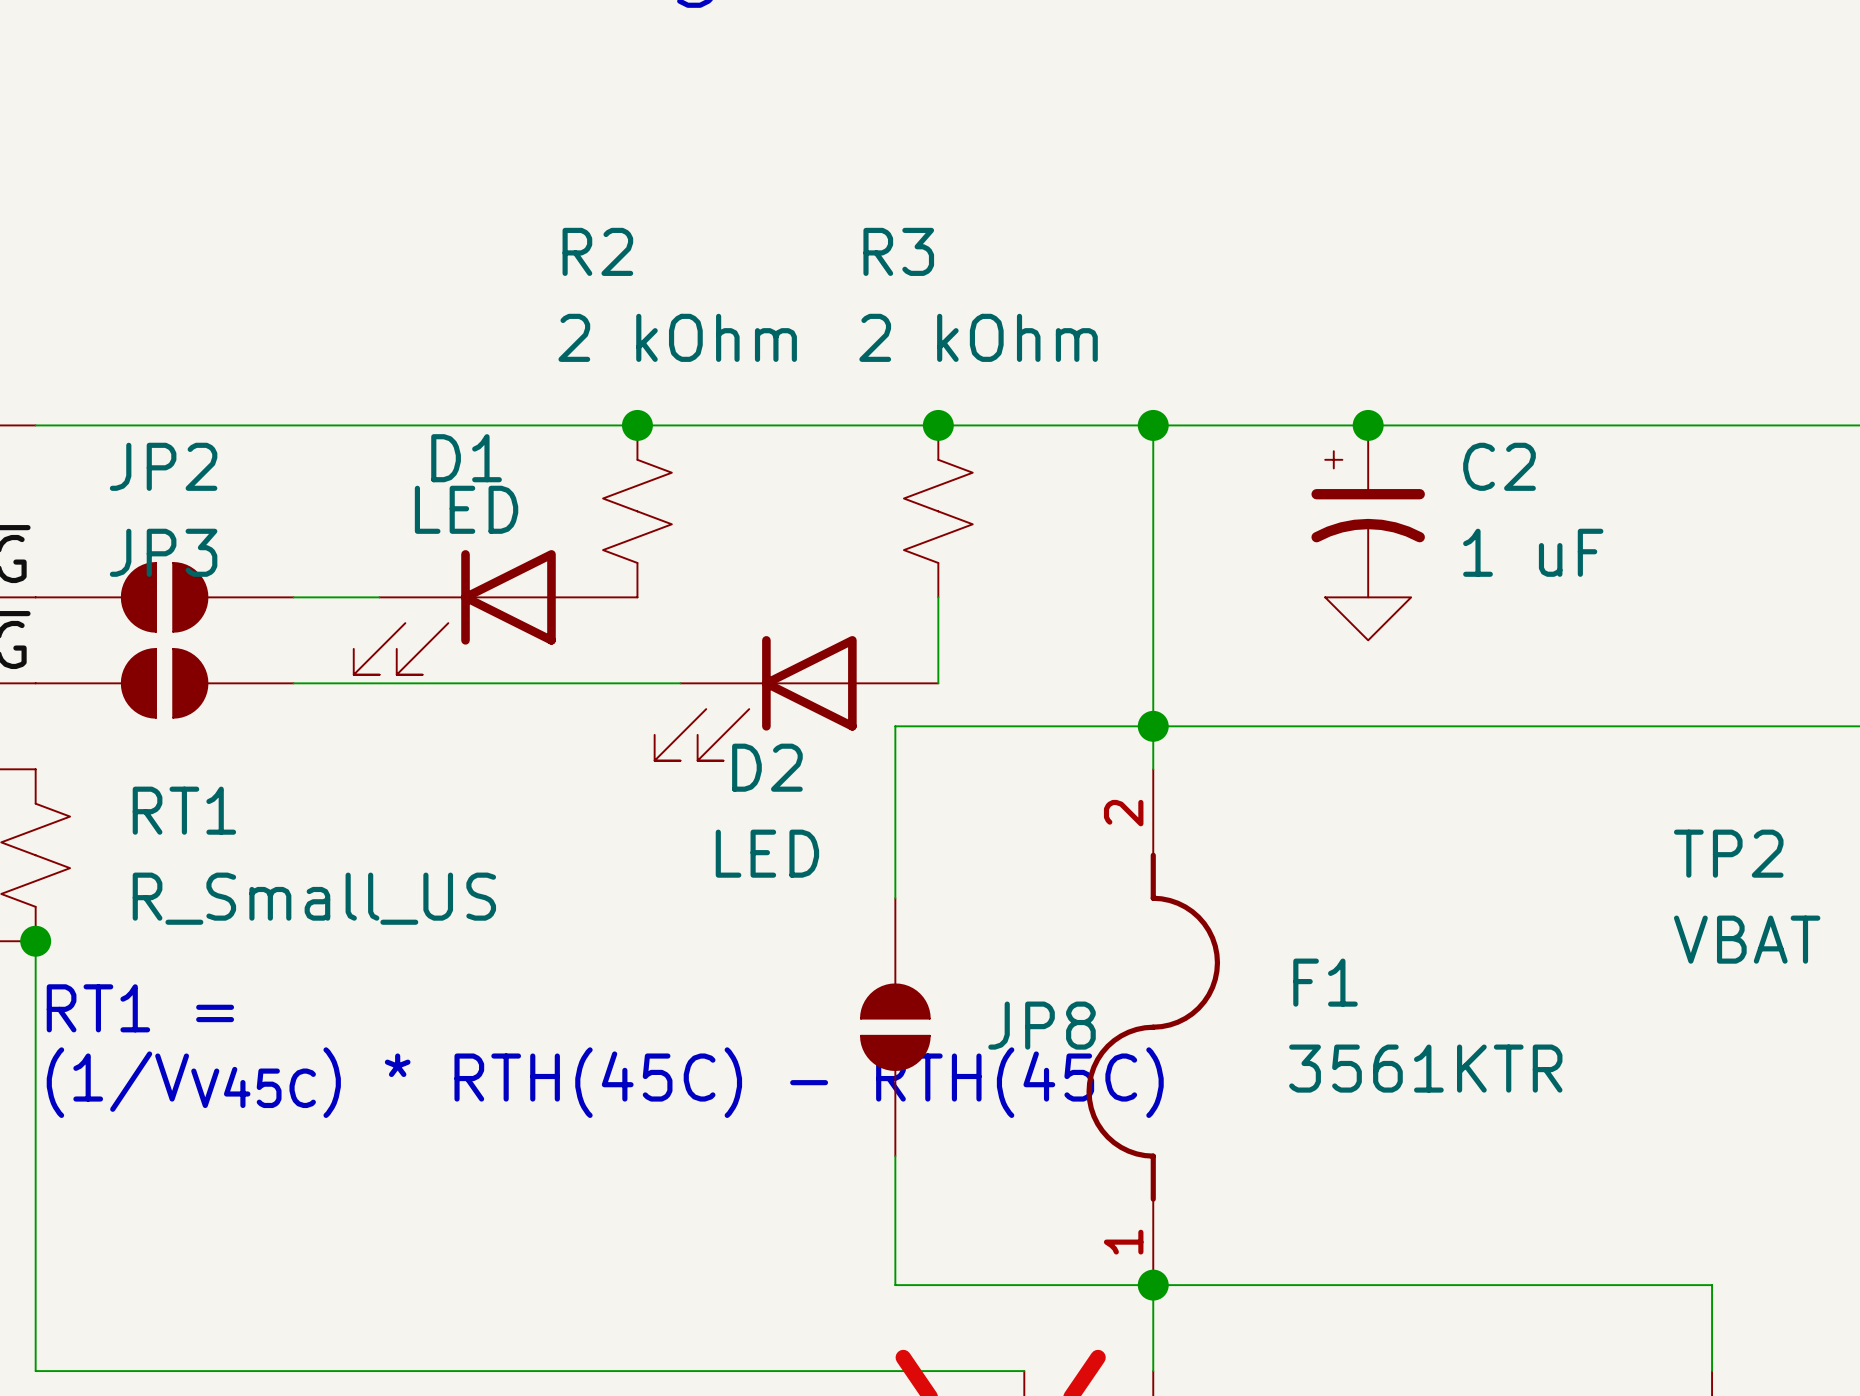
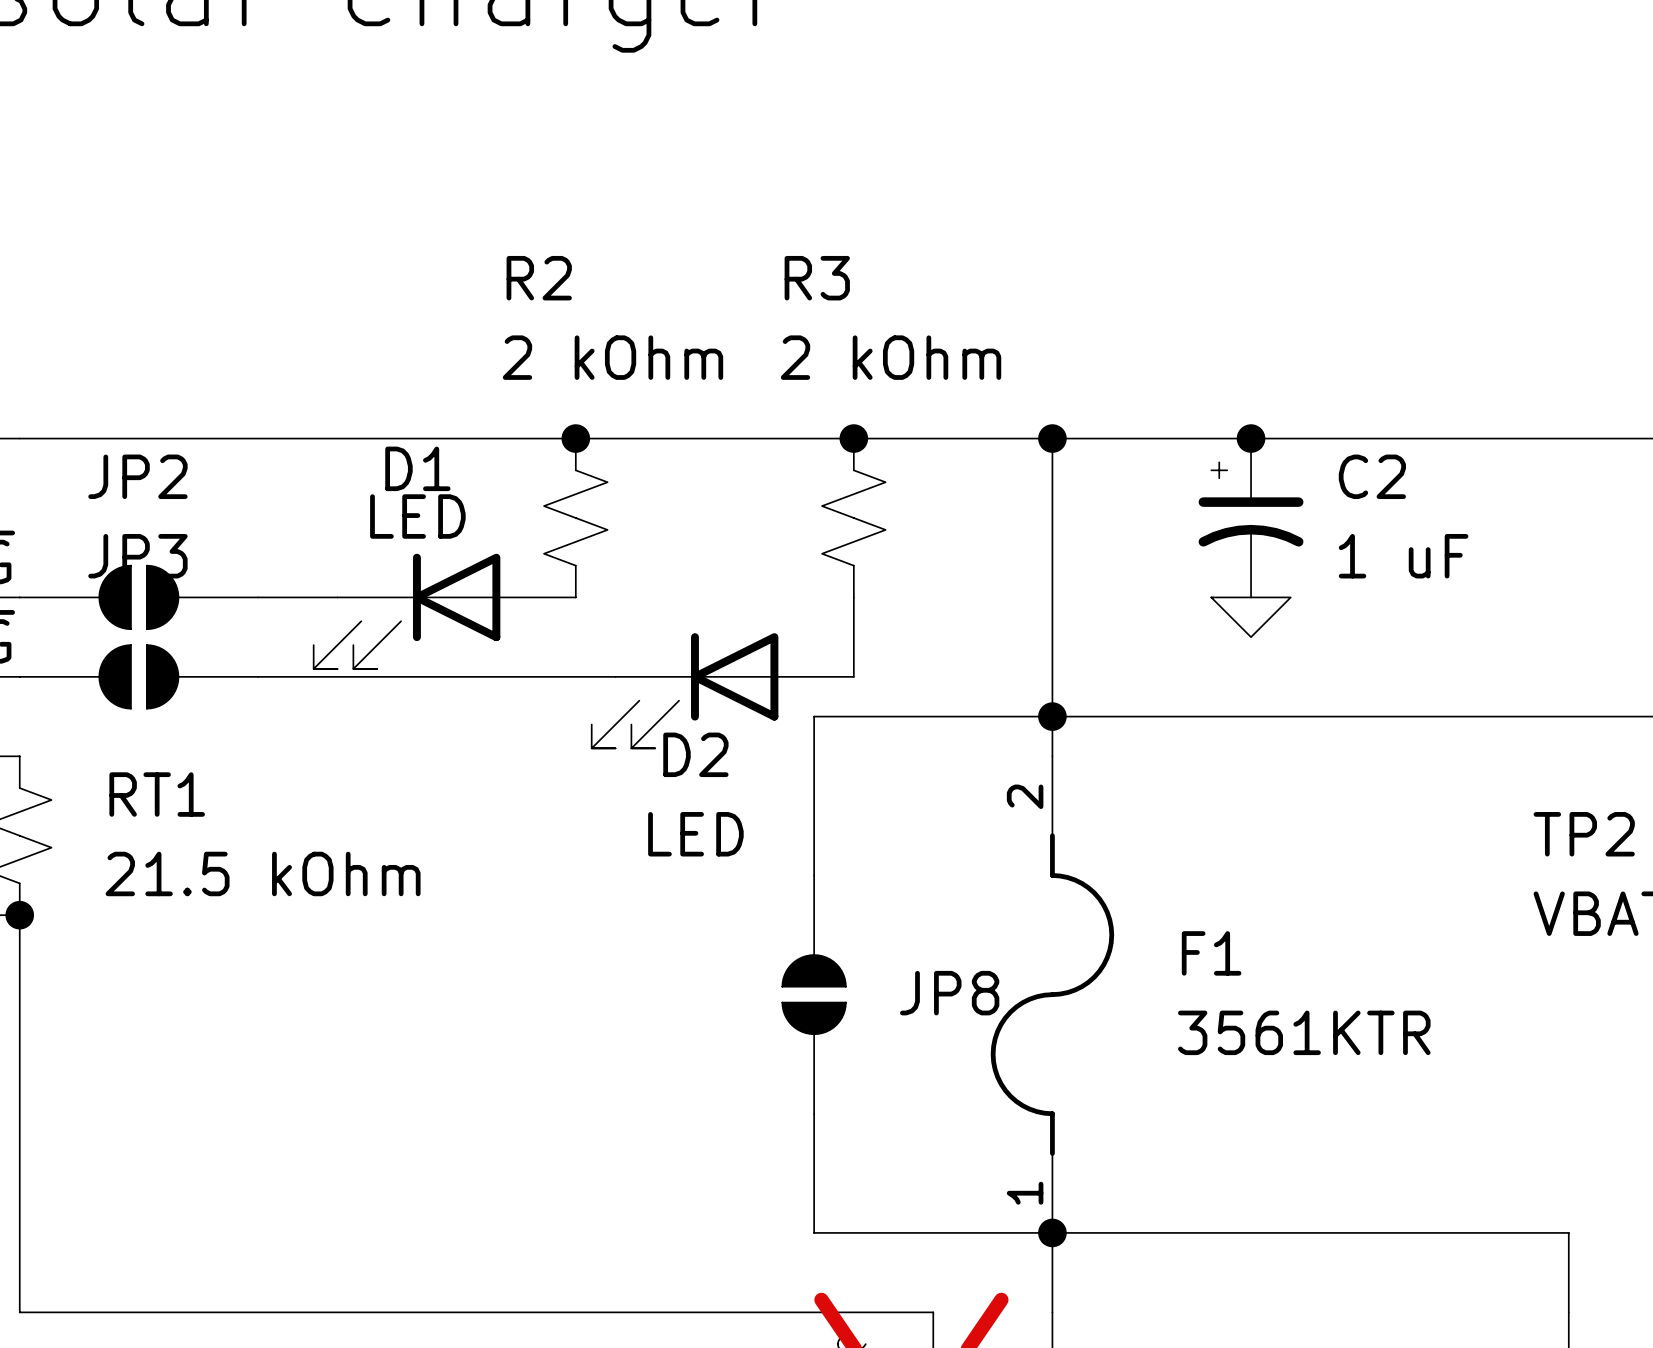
RT1 value: R_Small_US (314, 898) -> 21.5 kOhm (263, 873)
text: RT1 = (140, 1008) -> none
text: (1/VV45C) * RTH(45C) - RTH(45C) (605, 1082) -> none

